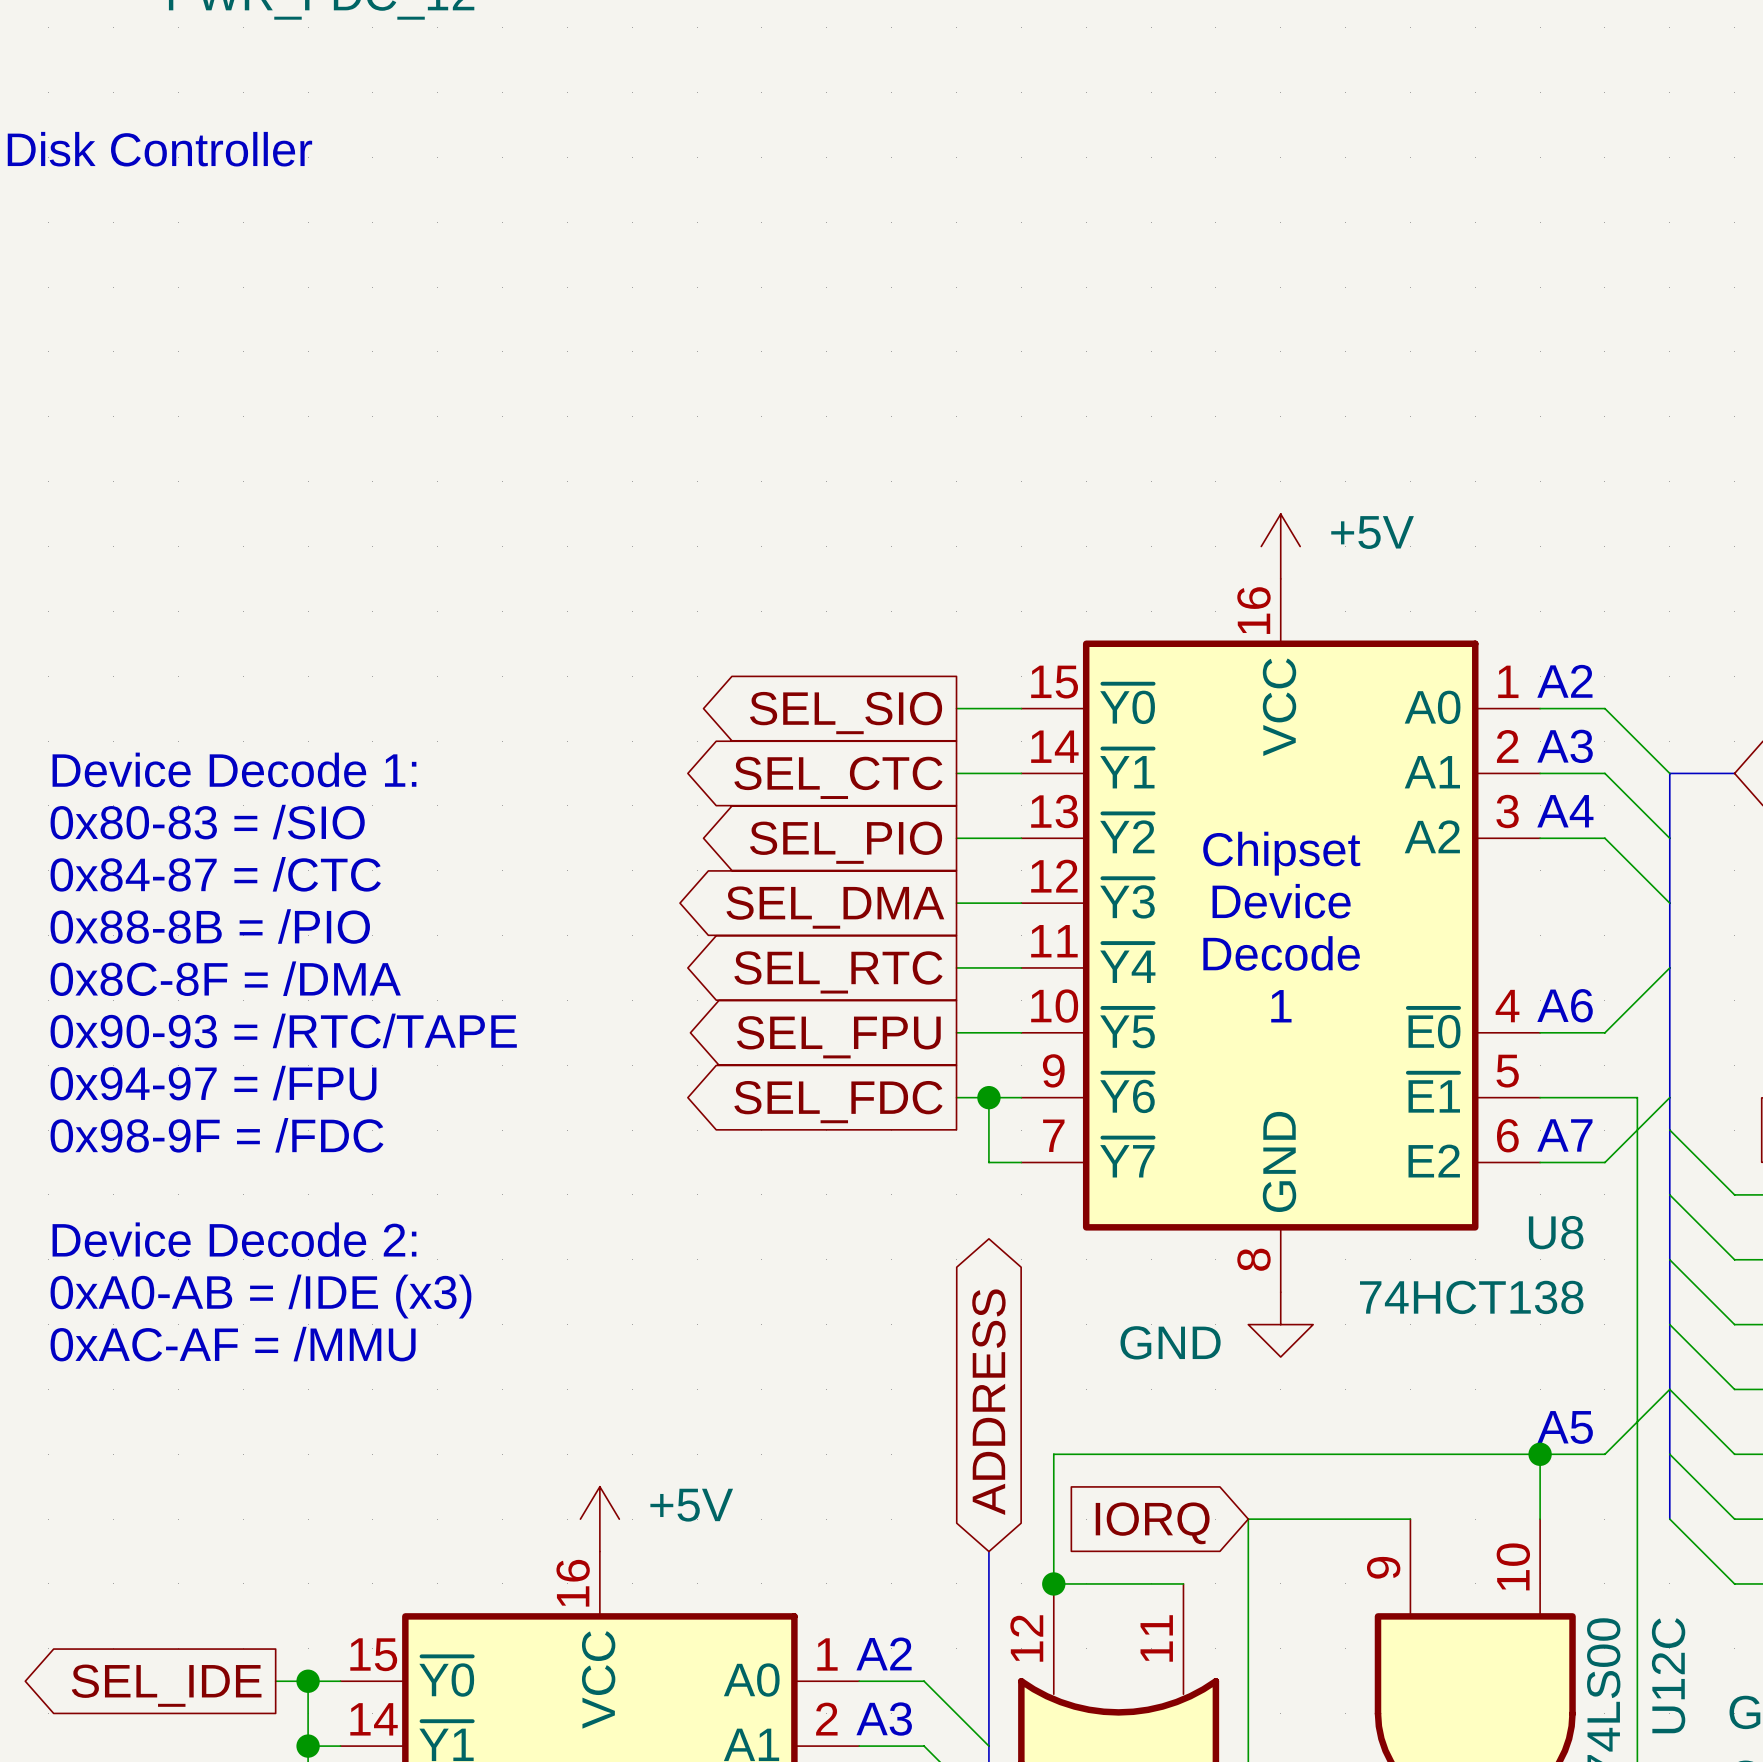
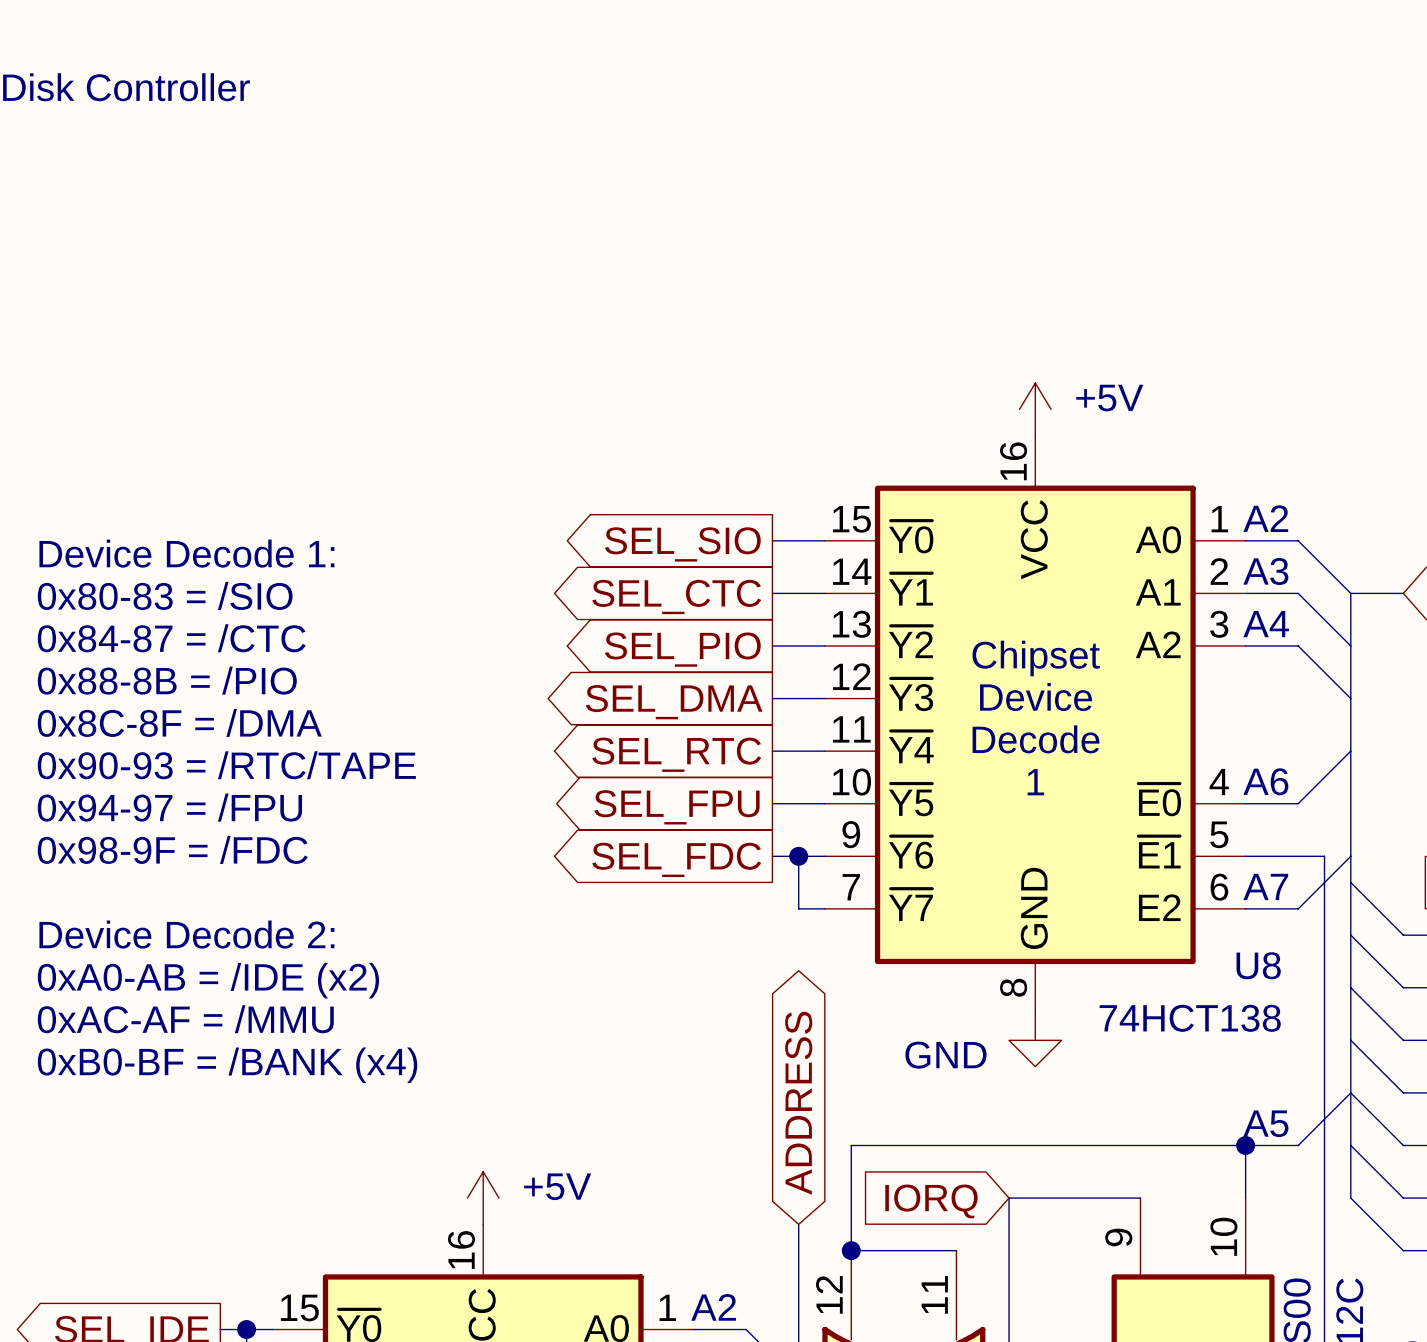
text position: Device Decode 1: (234, 769) -> Device Decode 1: (186, 553)
text position: 0x80-83 = /SIO (207, 822) -> 0x80-83 = /SIO (165, 595)
text position: 0x84-87 = /CTC (215, 874) -> 0x84-87 = /CTC (171, 638)
text position: 0x88-8B = /PIO (210, 926) -> 0x88-8B = /PIO (167, 680)
text position: 0x8C-8F = /DMA (225, 978) -> 0x8C-8F = /DMA (179, 722)
text position: 0x90-93 = /RTC/TAPE (283, 1030) -> 0x90-93 = /RTC/TAPE (226, 765)
text position: 0x94-97 = /FPU (213, 1083) -> 0x94-97 = /FPU (169, 807)
text position: 0x98-9F = /FDC (217, 1135) -> 0x98-9F = /FDC (172, 849)
text position: Device Decode 2: (234, 1239) -> Device Decode 2: (186, 934)
text: none -> 0xA0-AB = /IDE (x2) (208, 980)
text: 0xA0-AB = /IDE (x3) (260, 1296) -> none
text position: 0xAC-AF = /MMU (233, 1344) -> 0xAC-AF = /MMU (185, 1019)
text: none -> 0xB0-BF = /BANK (x4) (227, 1065)

